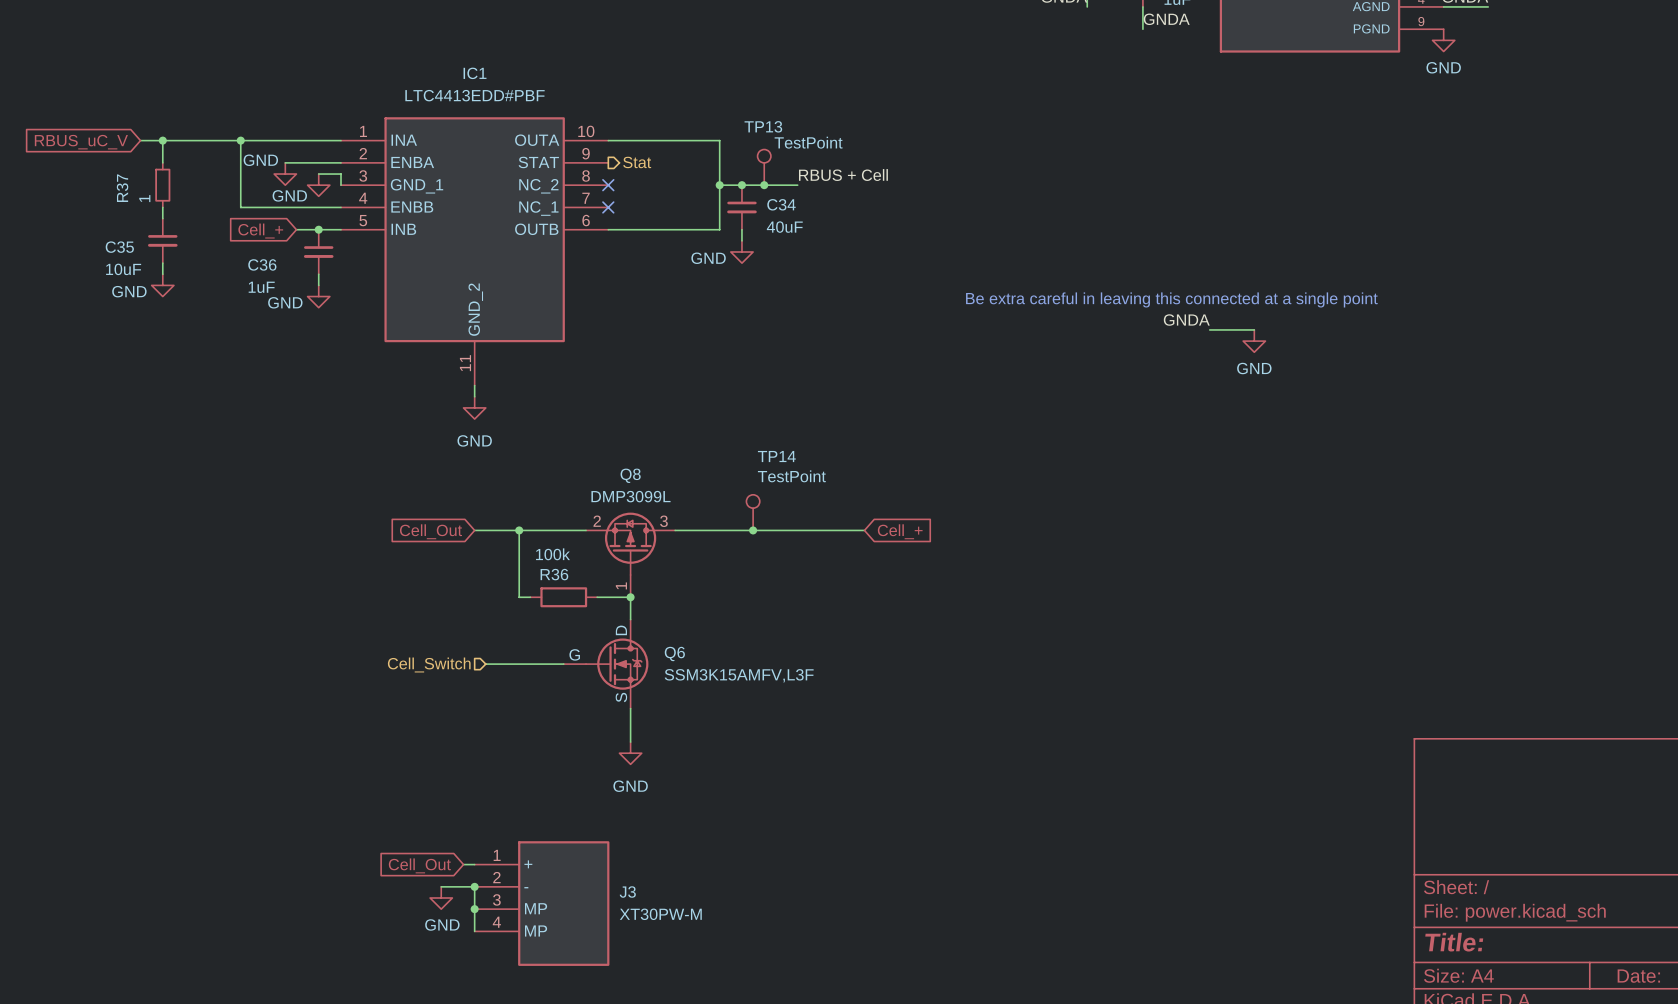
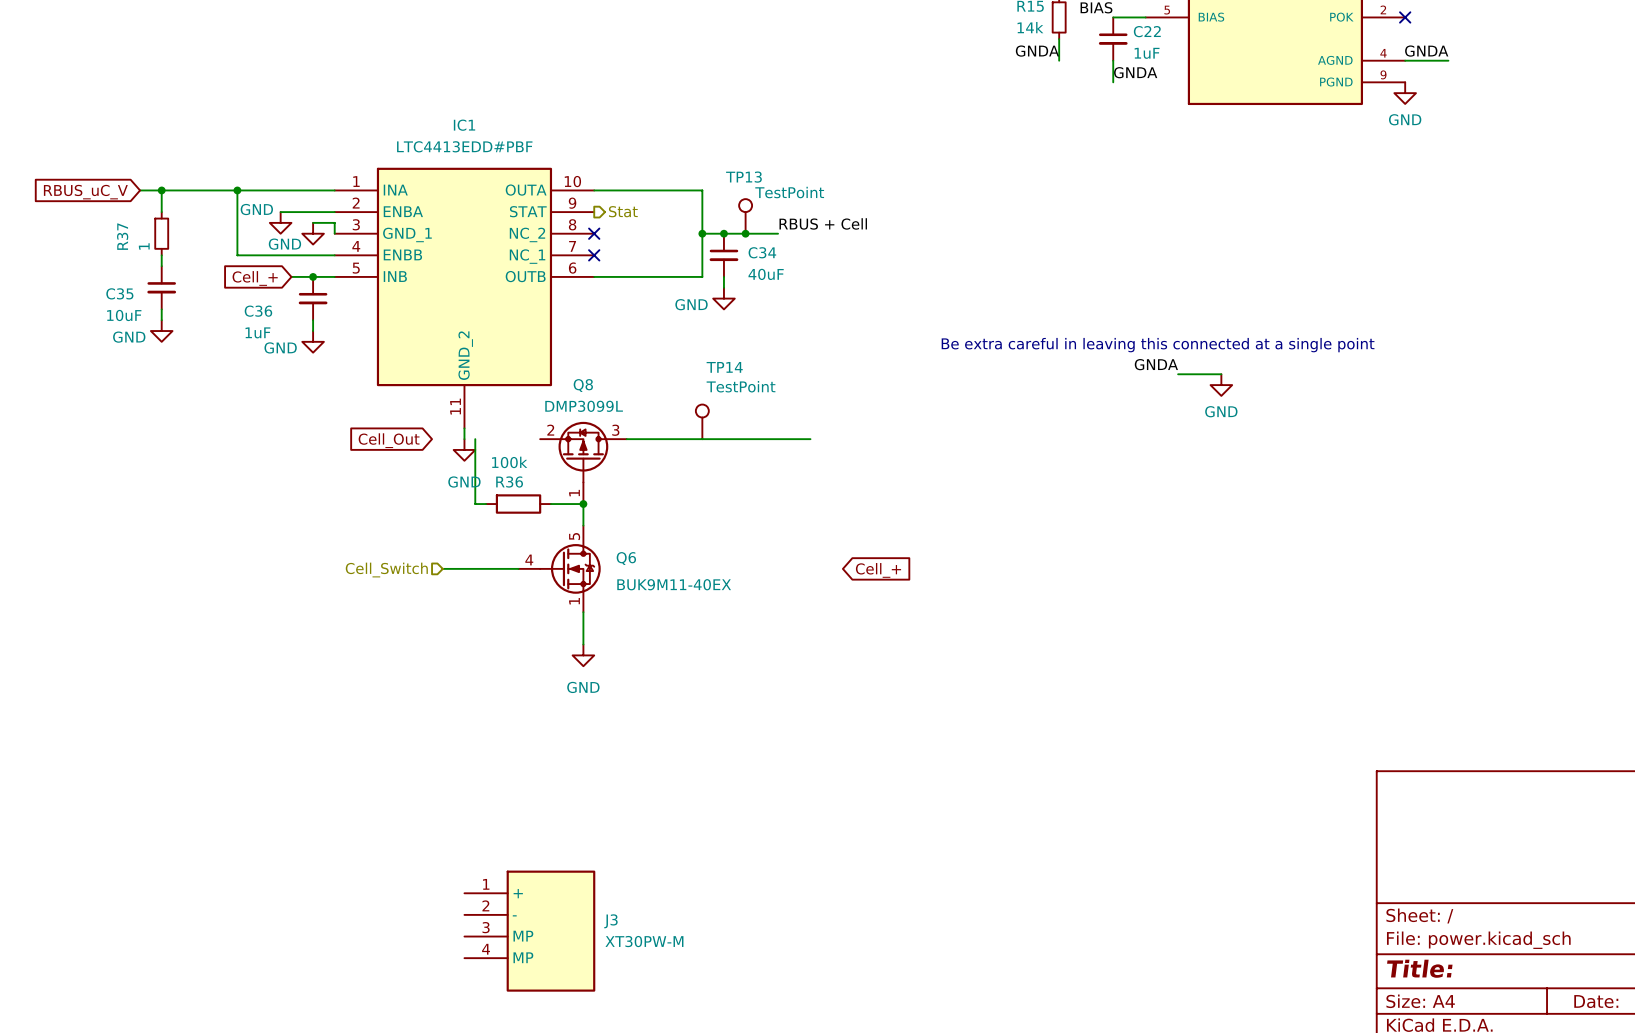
junction: none -> (583, 504)
Q6 pin number: none -> 5 (574, 536)
TP14 position: (753, 512) -> (702, 421)
Q6 pin number: none -> 4 (529, 559)
wire: none -> (442, 568) (464, 568)
wire: (519, 530) (519, 597) (530, 597) -> (475, 439) (475, 504) (486, 504)
junction: (519, 530) -> none
wire: (675, 530) (864, 530) -> (626, 439) (810, 439)
junction: (753, 530) -> none
global label position: Cell_Out (430, 531) -> Cell_Out (389, 440)
Q8 position: (630, 554) -> (583, 462)
Q6 pin number: none -> 1 (574, 601)
R36 position: (563, 597) -> (518, 504)
wire: (597, 597) (630, 597) (630, 619) -> (550, 504) (583, 504) (583, 525)
junction: (630, 597) -> none
Q6 pin name: D (621, 630) -> none
Q6 pin name: G (574, 654) -> none
hierarchical label position: Cell_Switch (429, 664) -> Cell_Switch (386, 570)
wire: (485, 664) (563, 664) -> none
Q6 position: (606, 664) -> (559, 568)
Q6 value: SSM3K15AMFV,L3F (739, 675) -> BUK9M11-40EX (674, 584)
Q6 pin name: S (621, 697) -> none
wire: (630, 708) (630, 742) -> (583, 612) (583, 644)
power symbol position: GND (630, 753) -> GND (583, 655)
wire: (463, 864) (474, 864) -> none
global label: Cell_Out (419, 865) -> none
wire: (441, 886) (474, 886) (474, 931) -> none
junction: (474, 886) -> none
power symbol: GND (441, 898) -> none
junction: (474, 909) -> none

